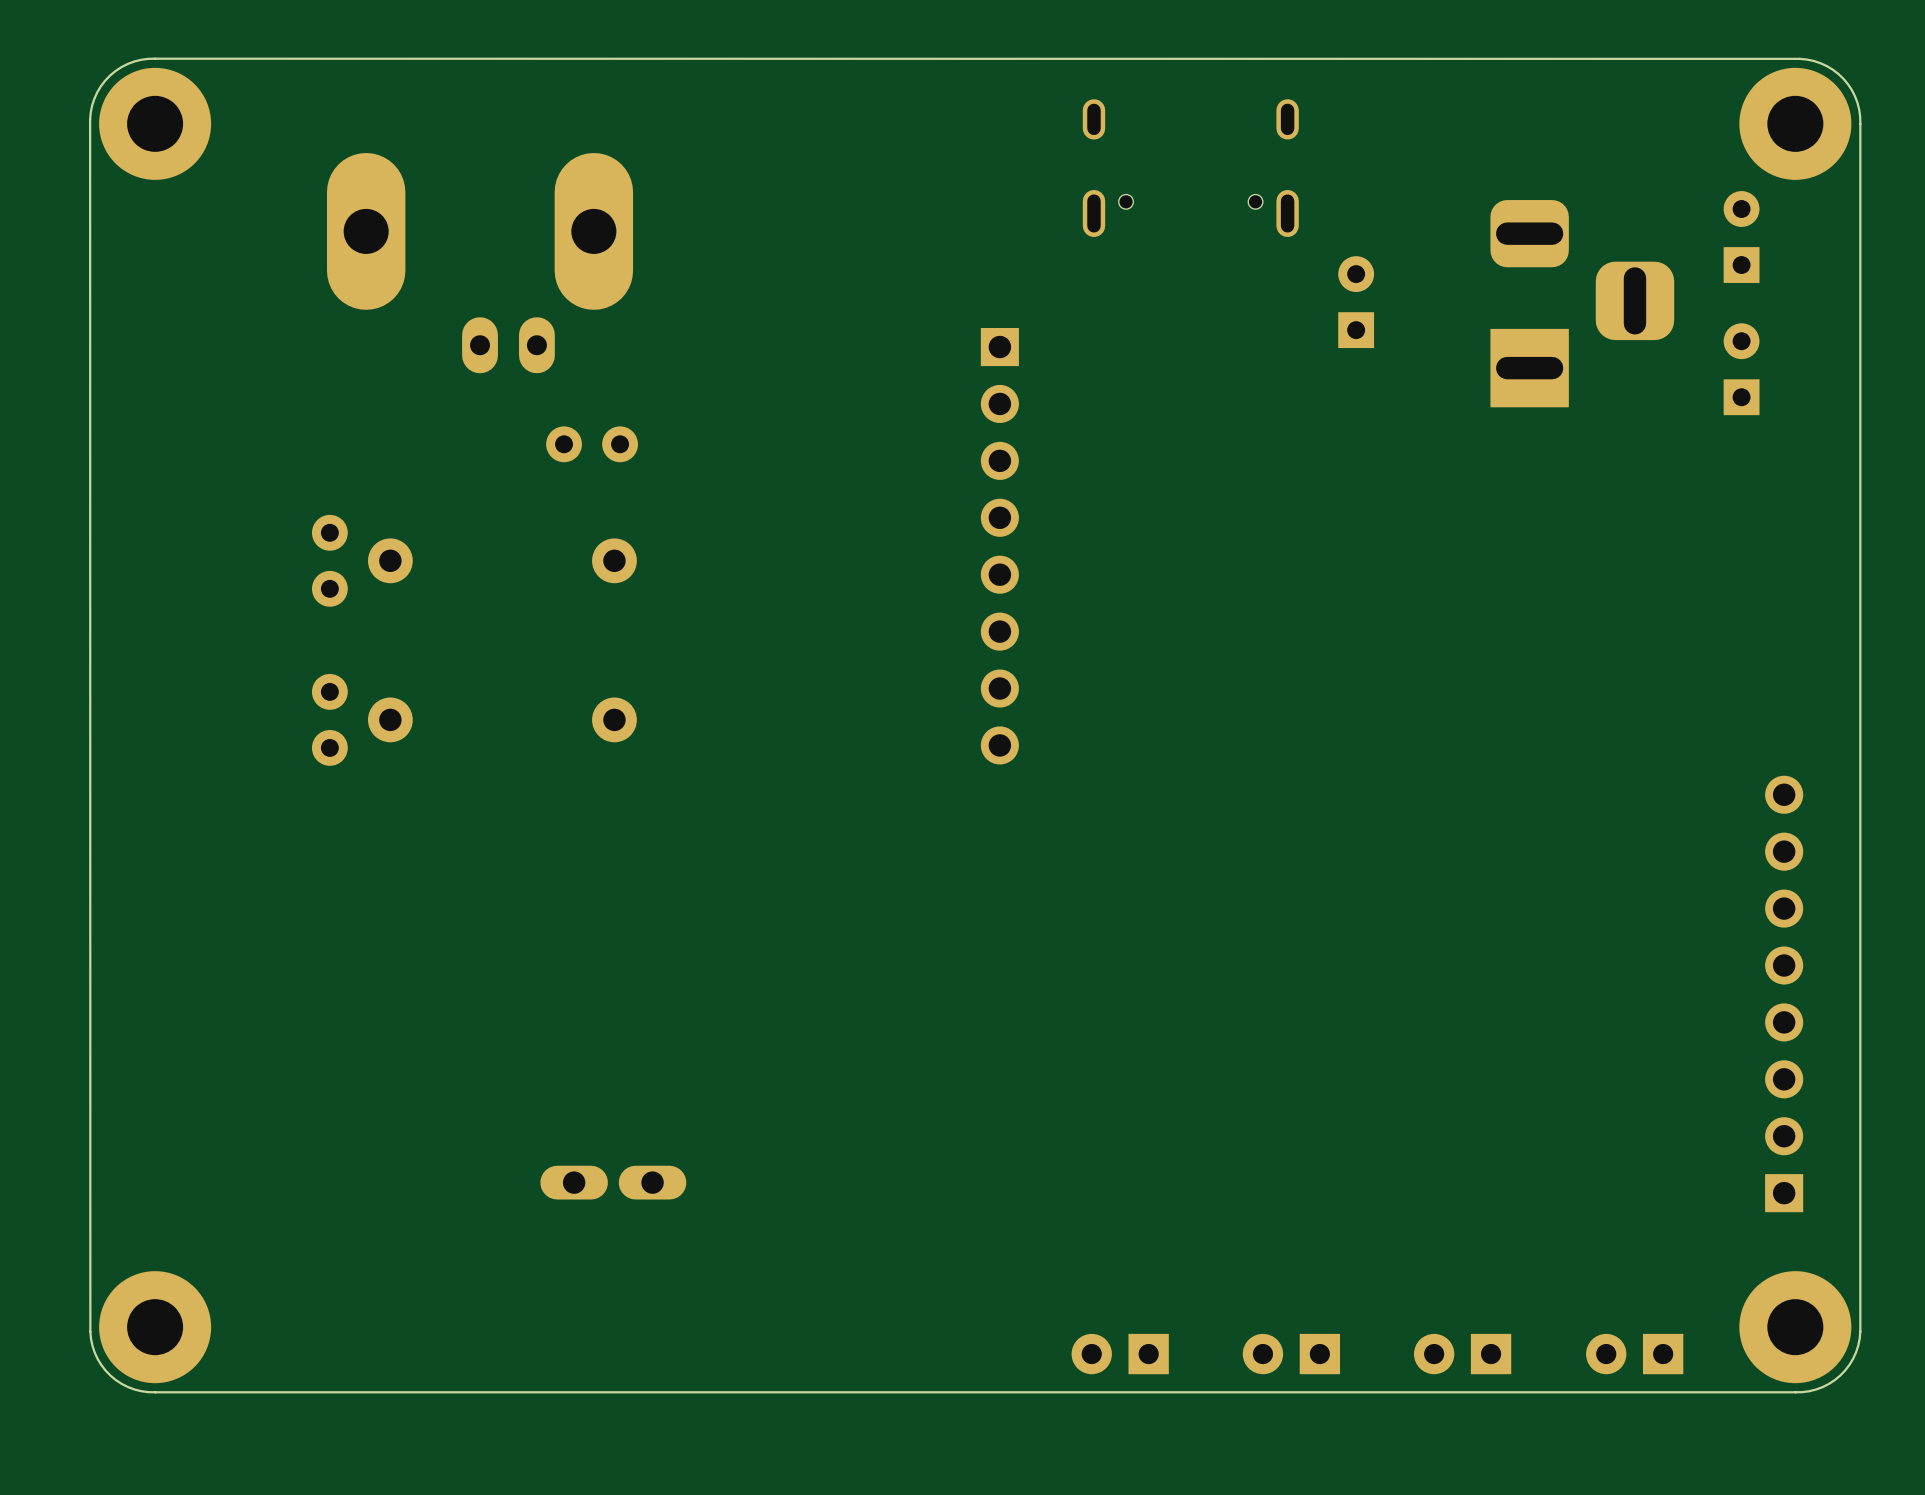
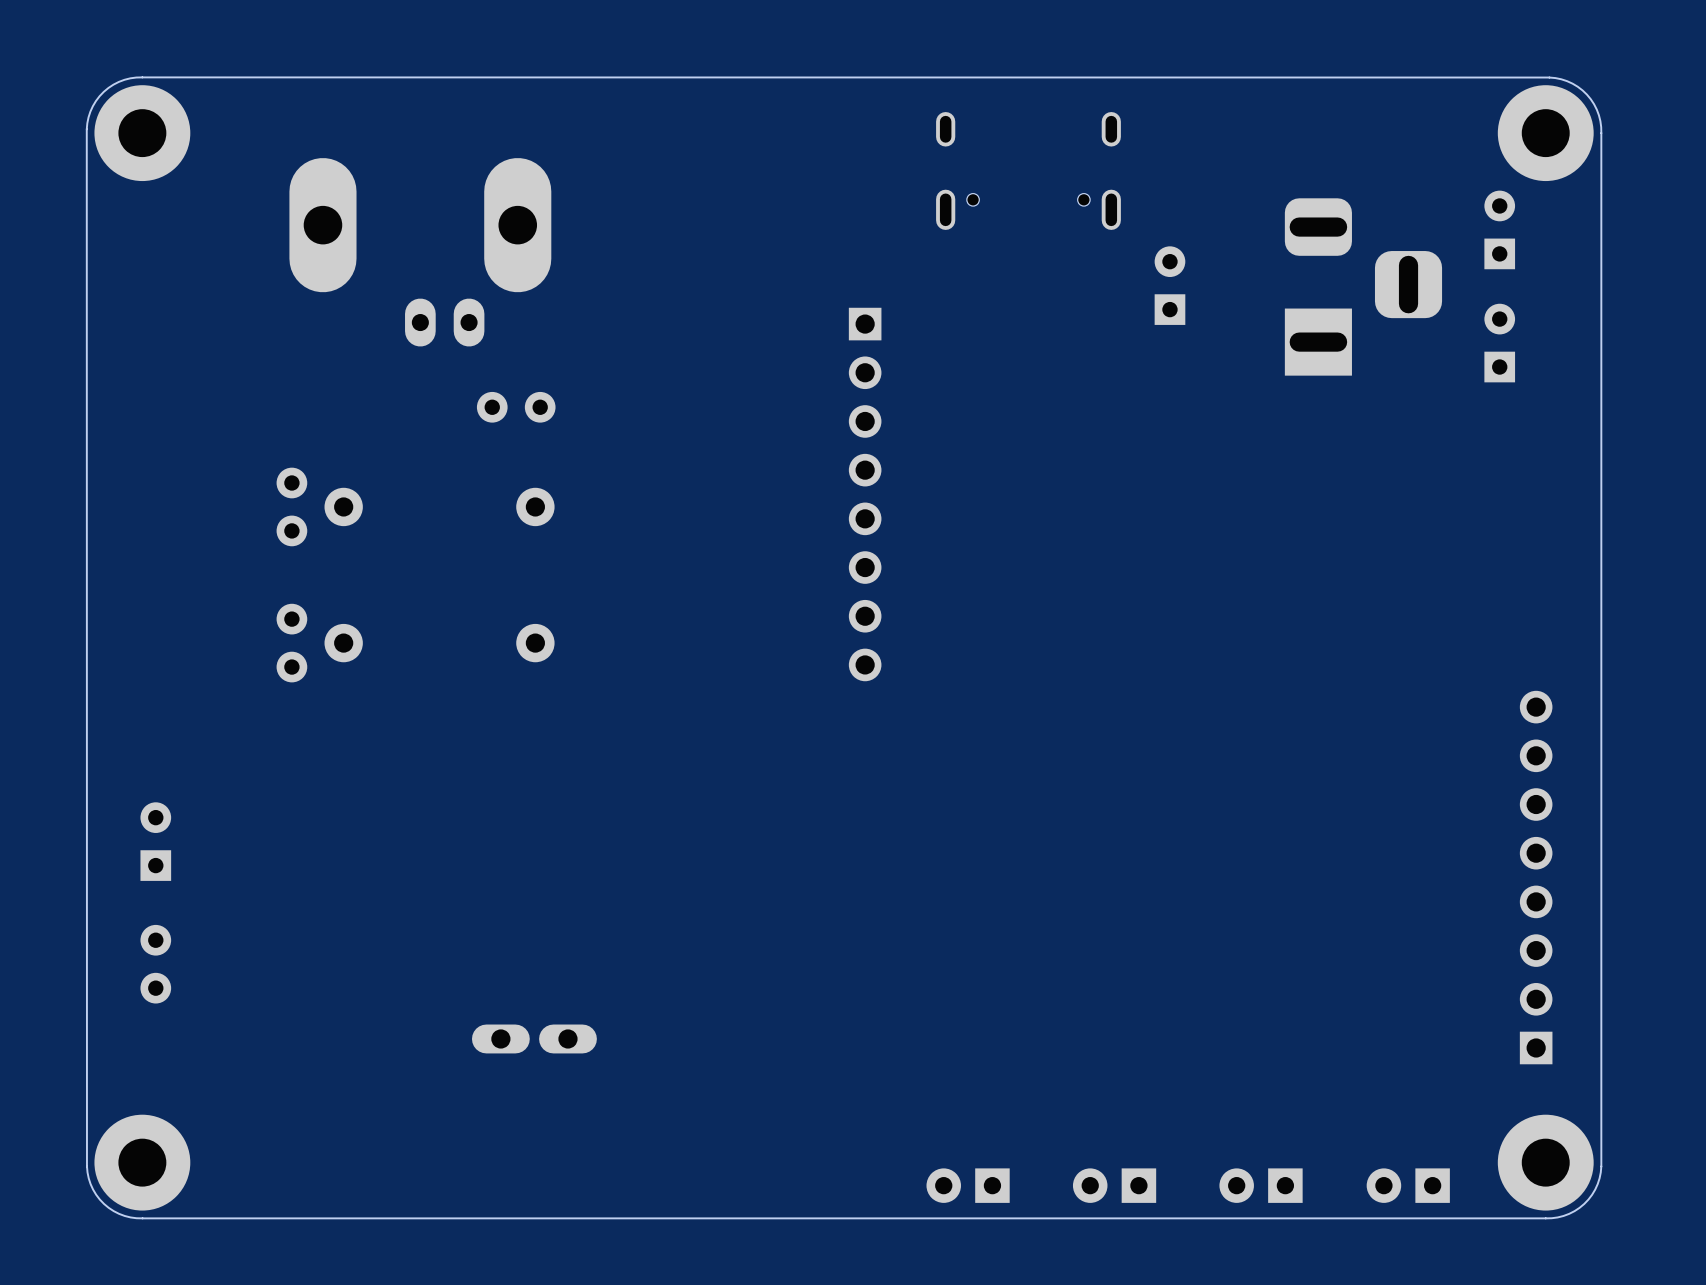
part: none -> (155, 841)
part: none -> (155, 964)

